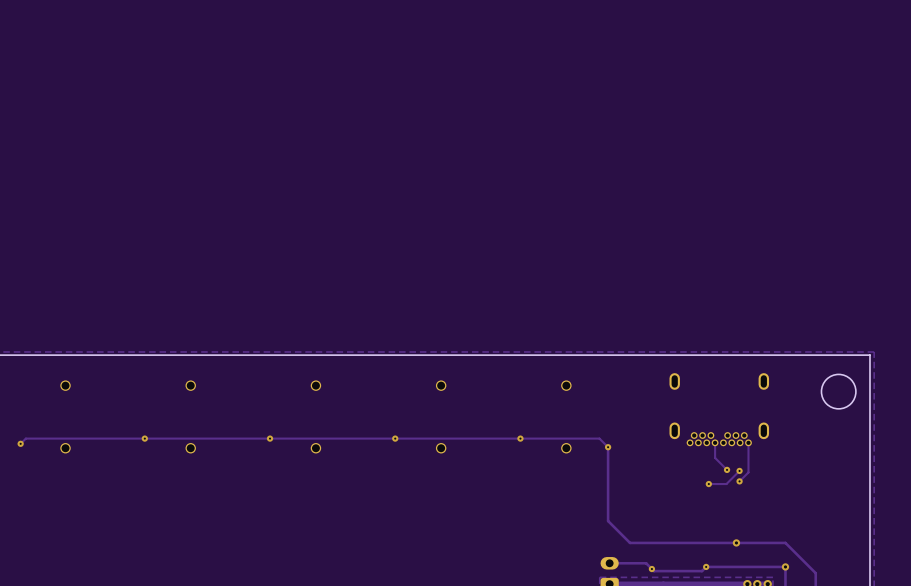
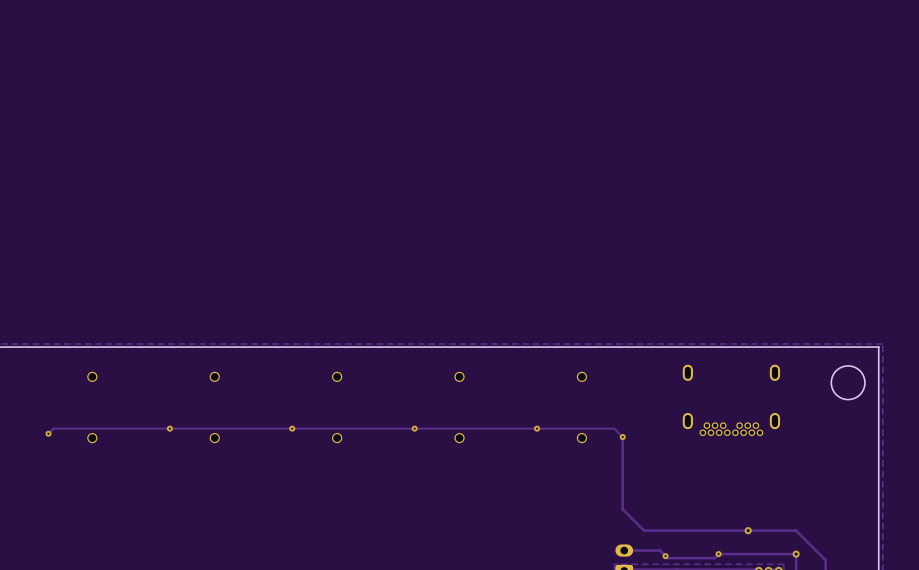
track: (715, 442) (715, 457) (727, 469) -> none
track: (748, 442) (748, 472) (739, 481) -> none
via: (727, 469) -> none
track: (739, 470) (726, 484) (708, 484) -> none
via: (739, 470) -> none
via: (739, 481) -> none
via: (708, 484) -> none

